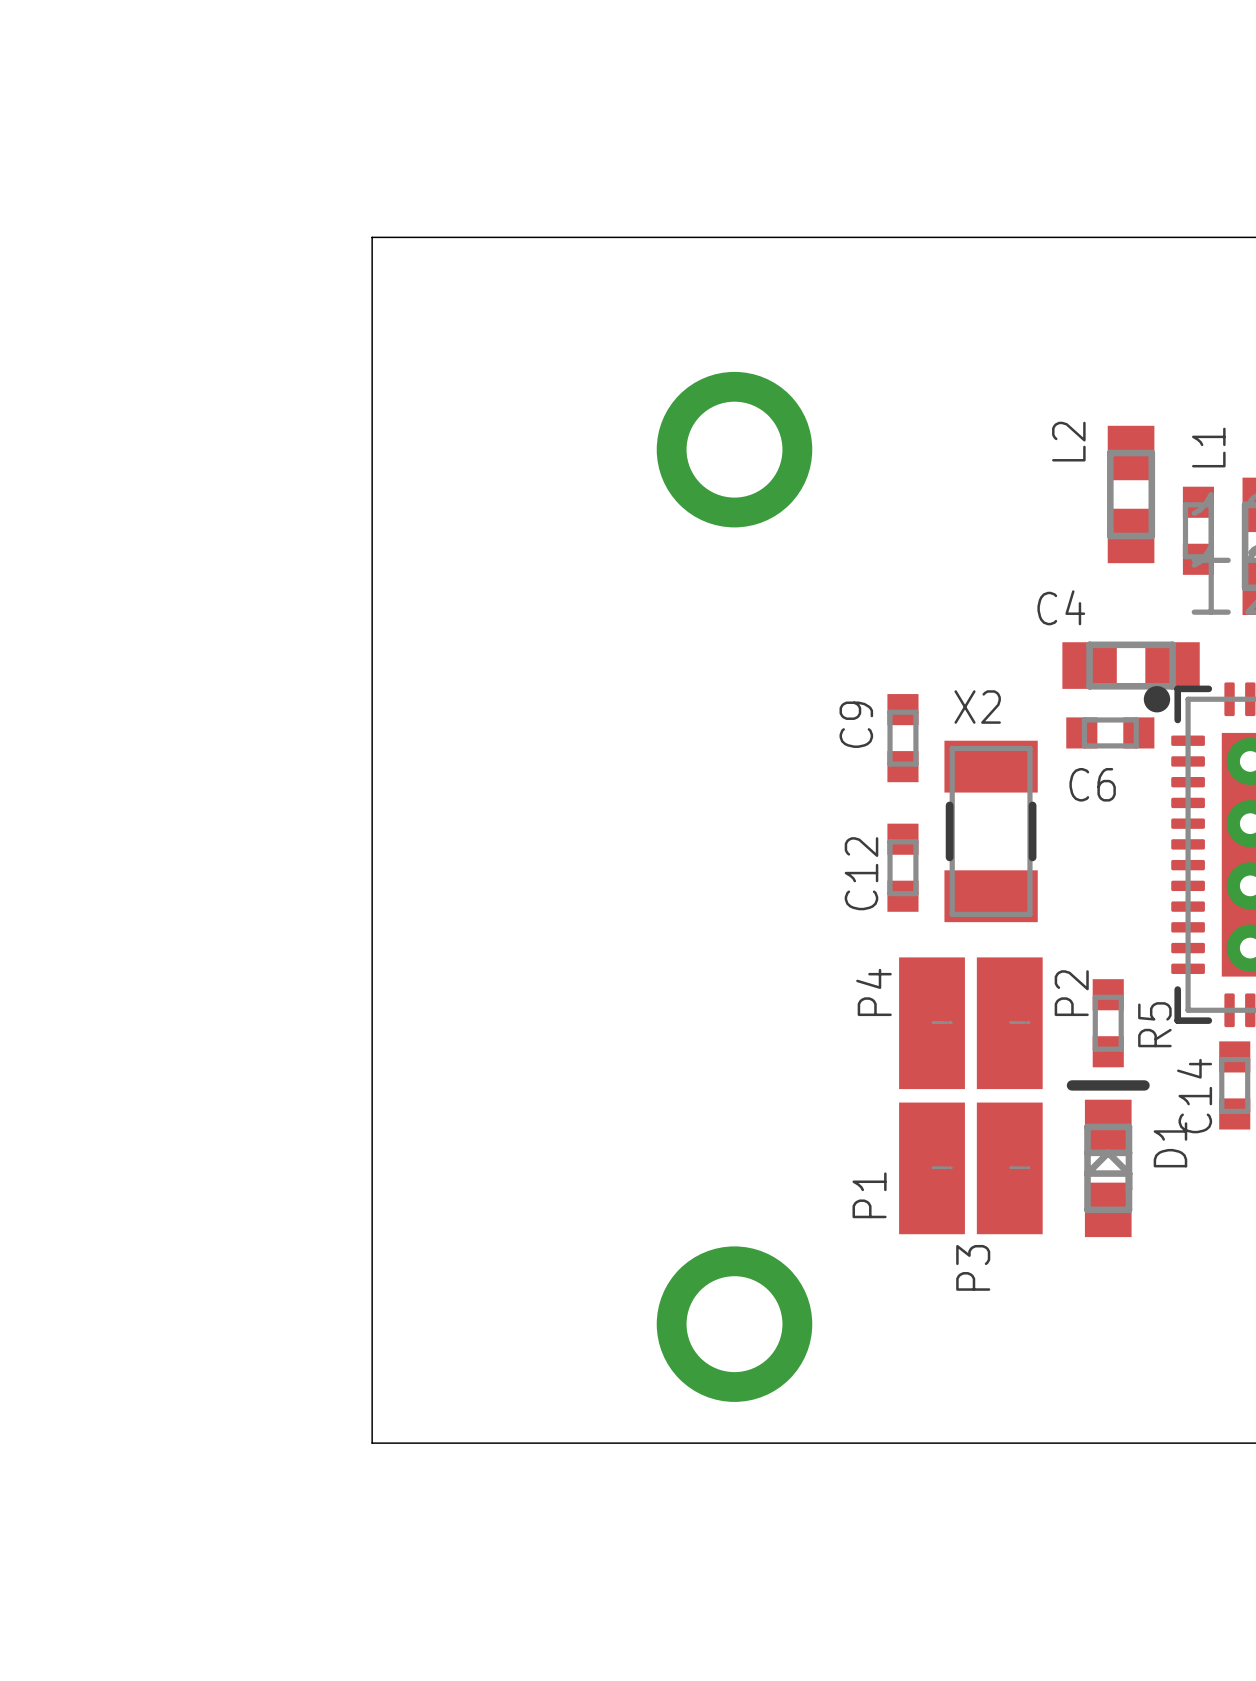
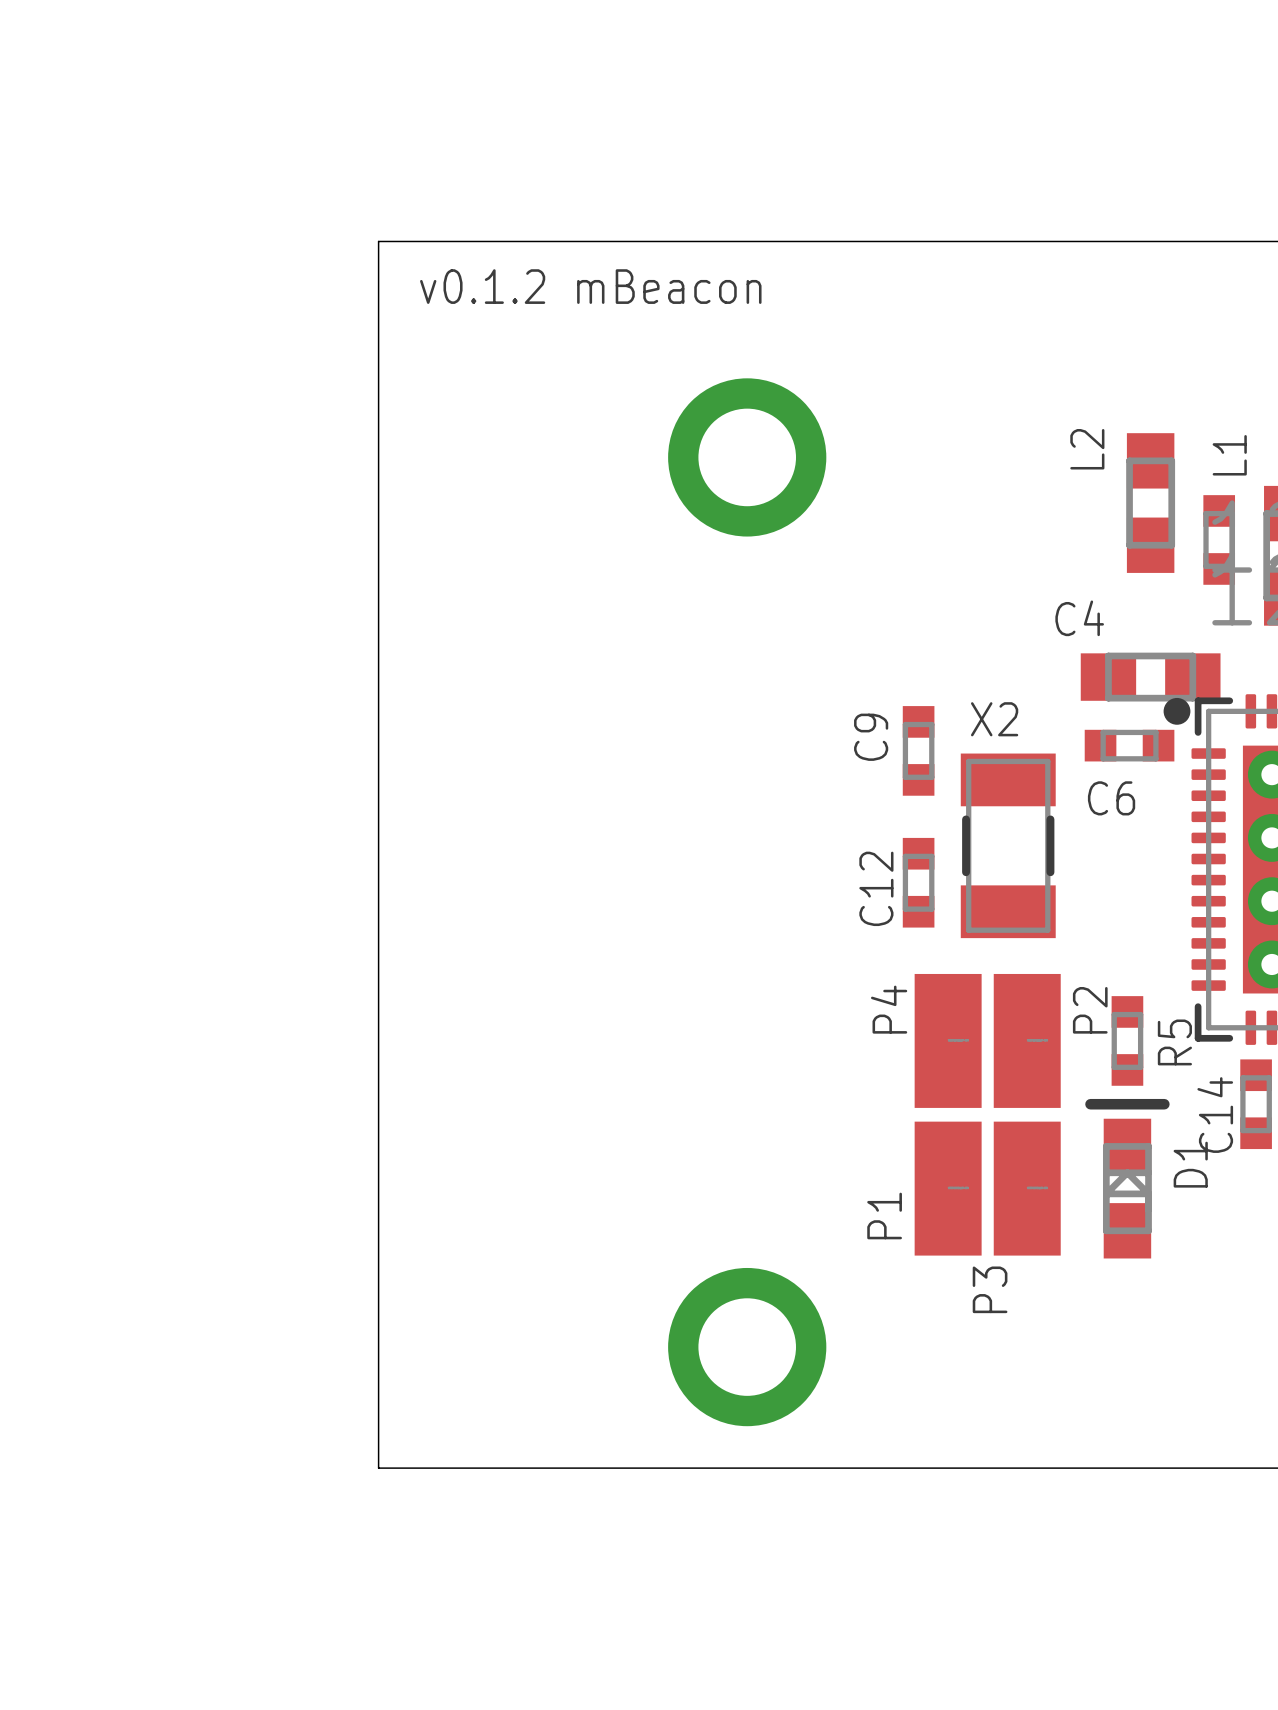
text: none -> v0.1.2 mBeacon (590, 286)

